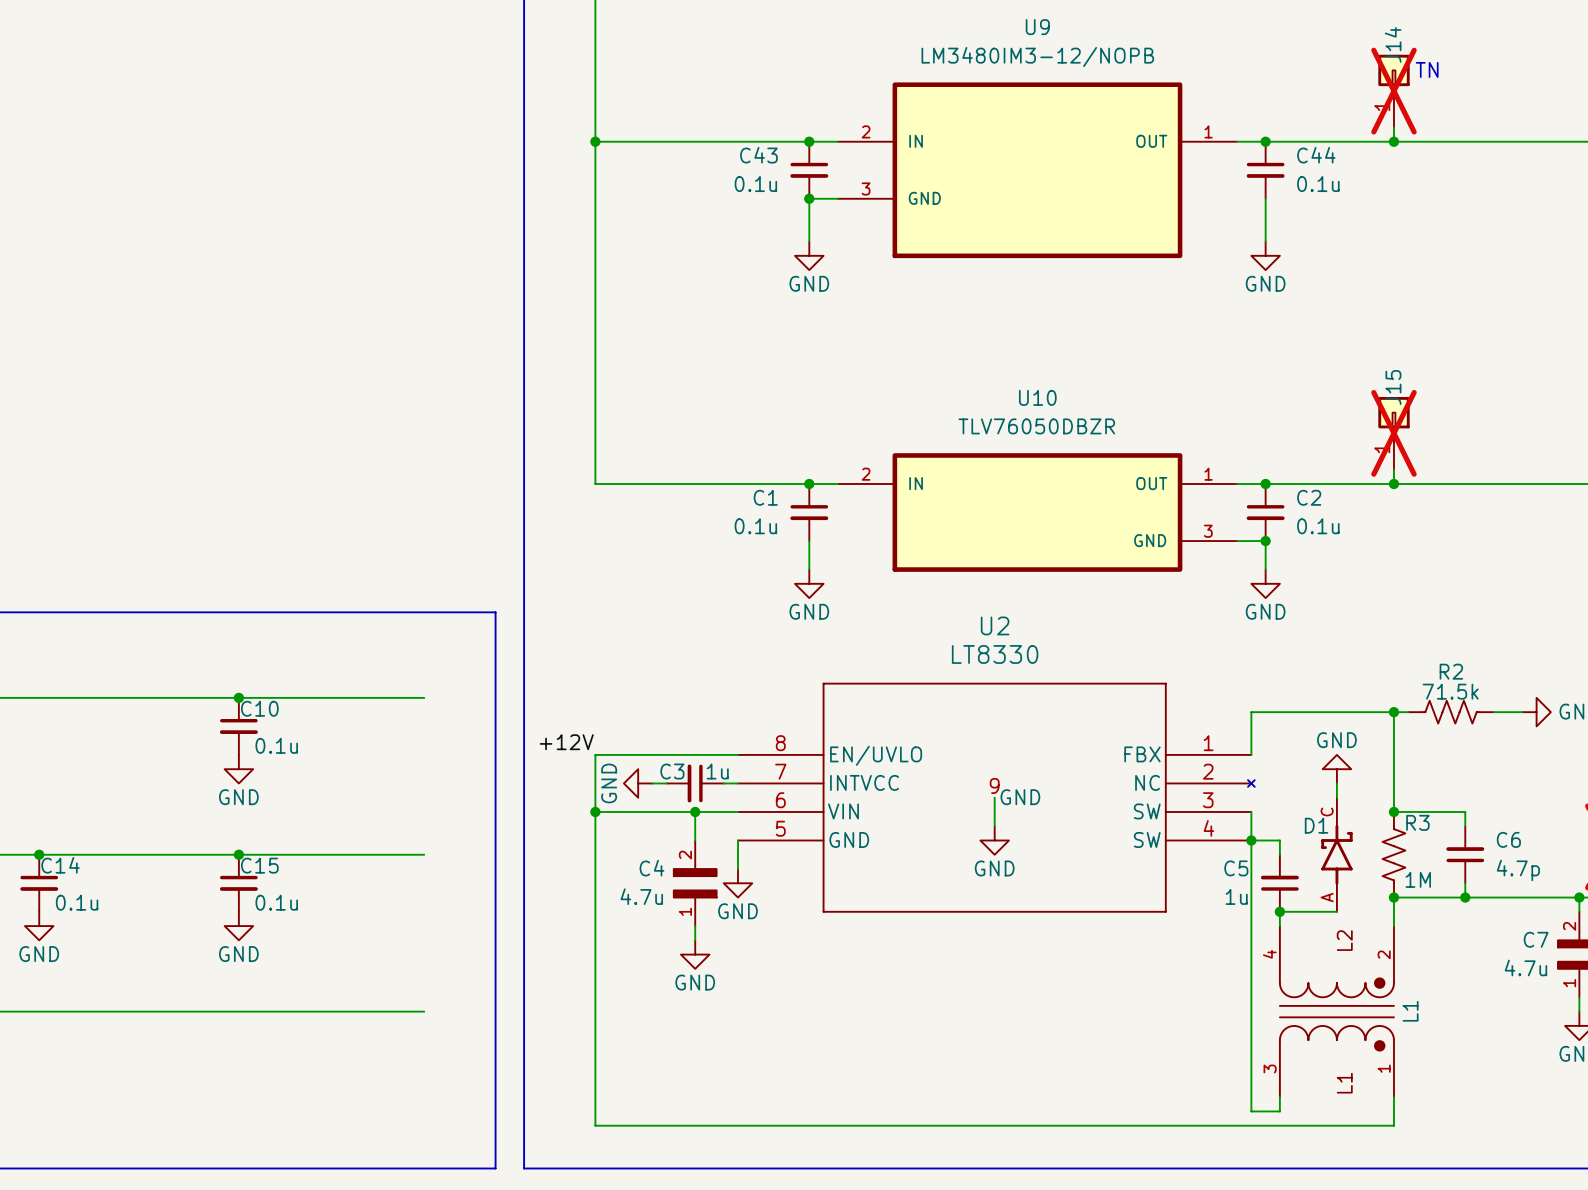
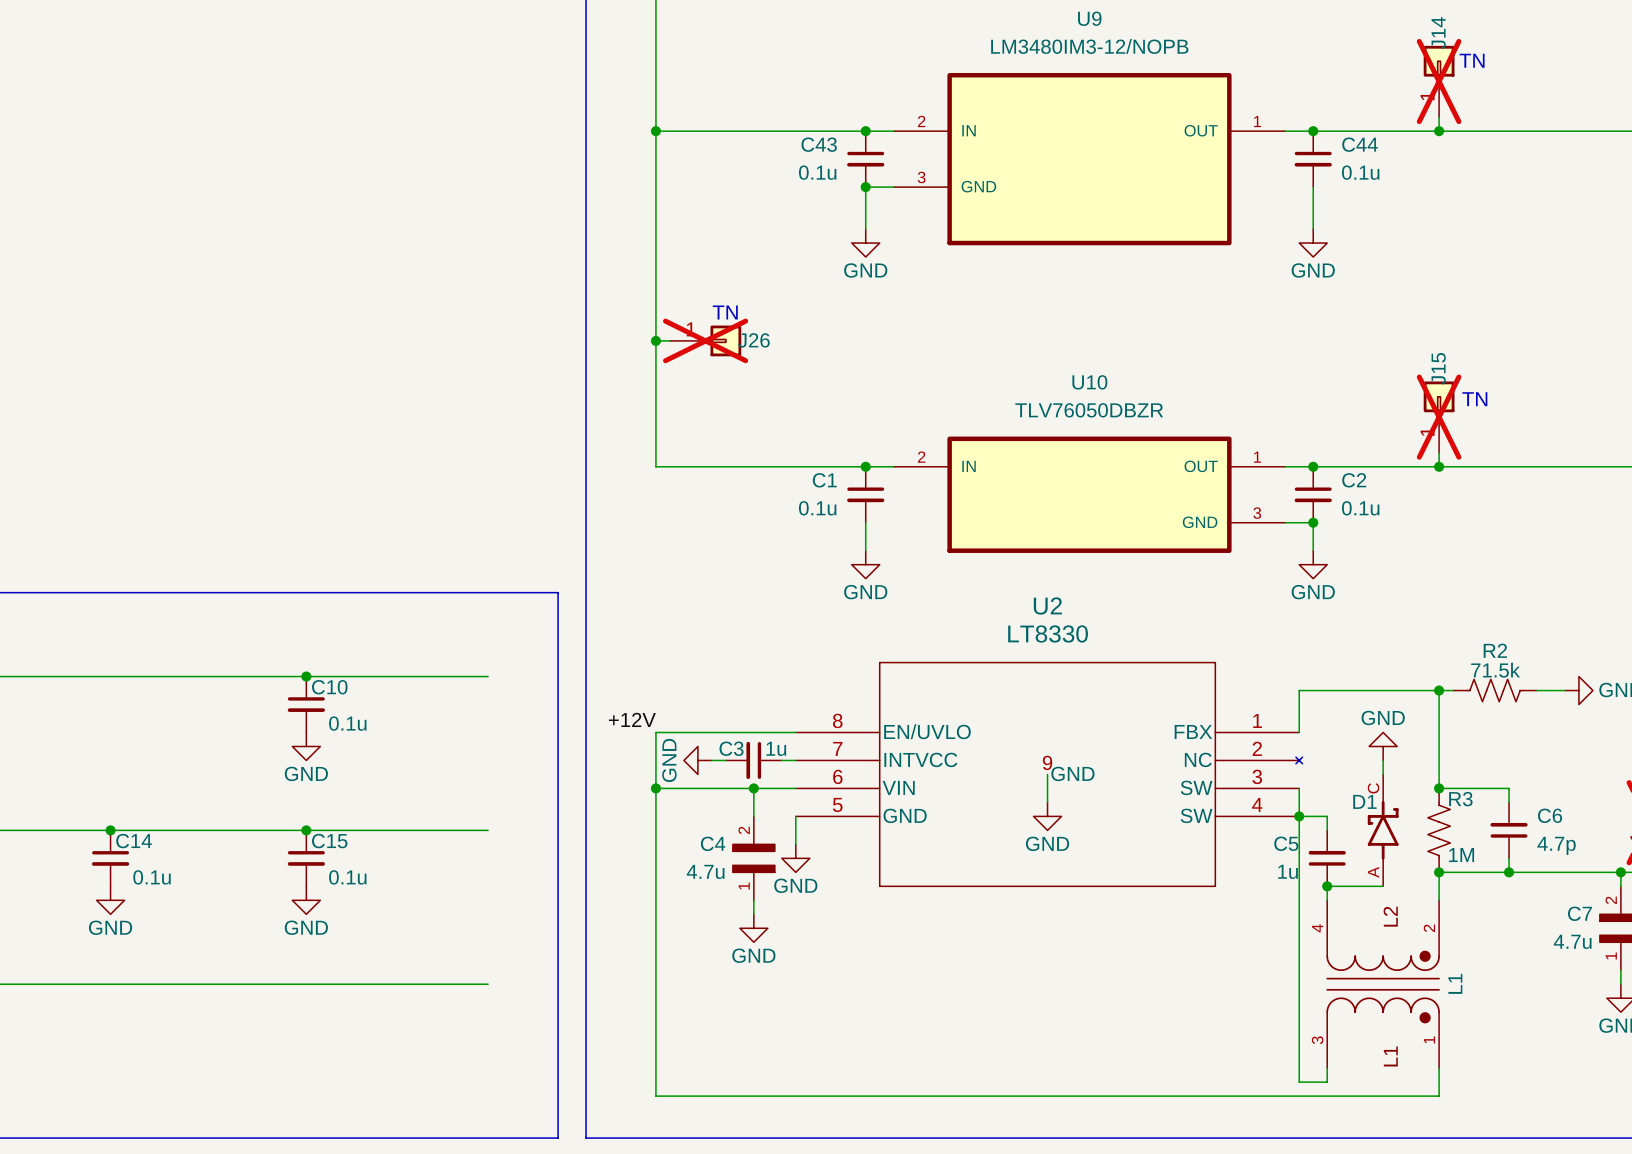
text: none -> TN (725, 312)
wire: none -> (655, 340) (669, 340)
junction: none -> (655, 340)
J26: none -> (705, 340)
text: none -> TN (1474, 399)

